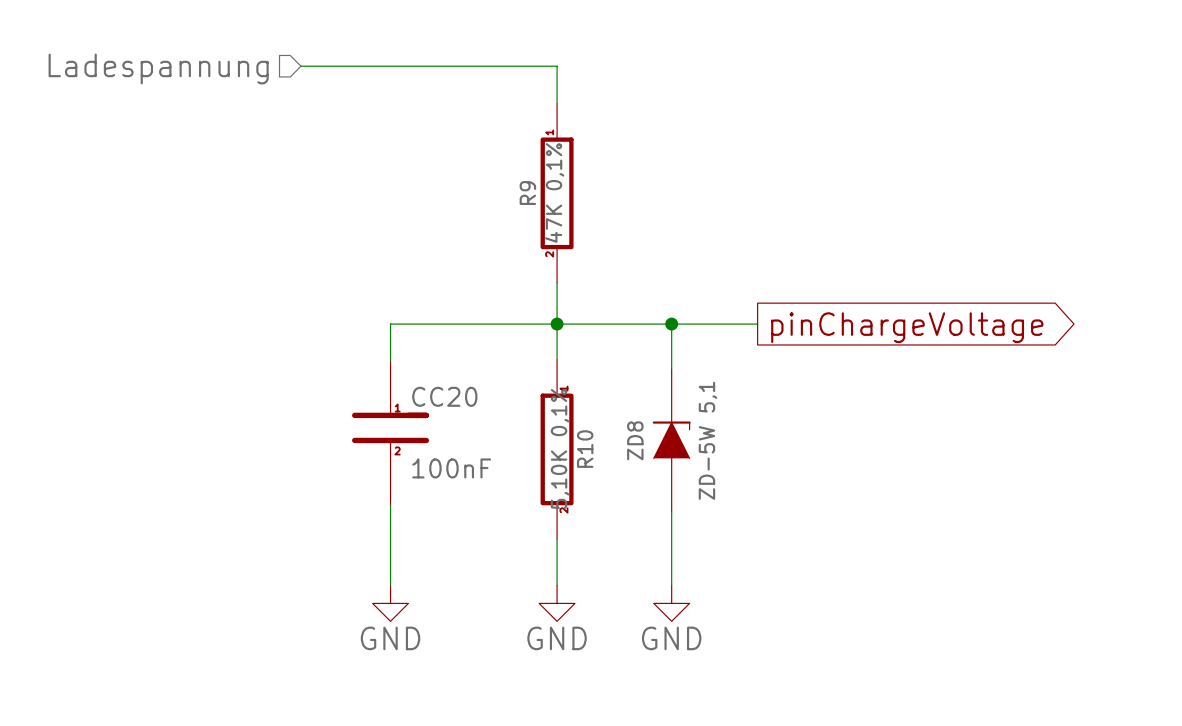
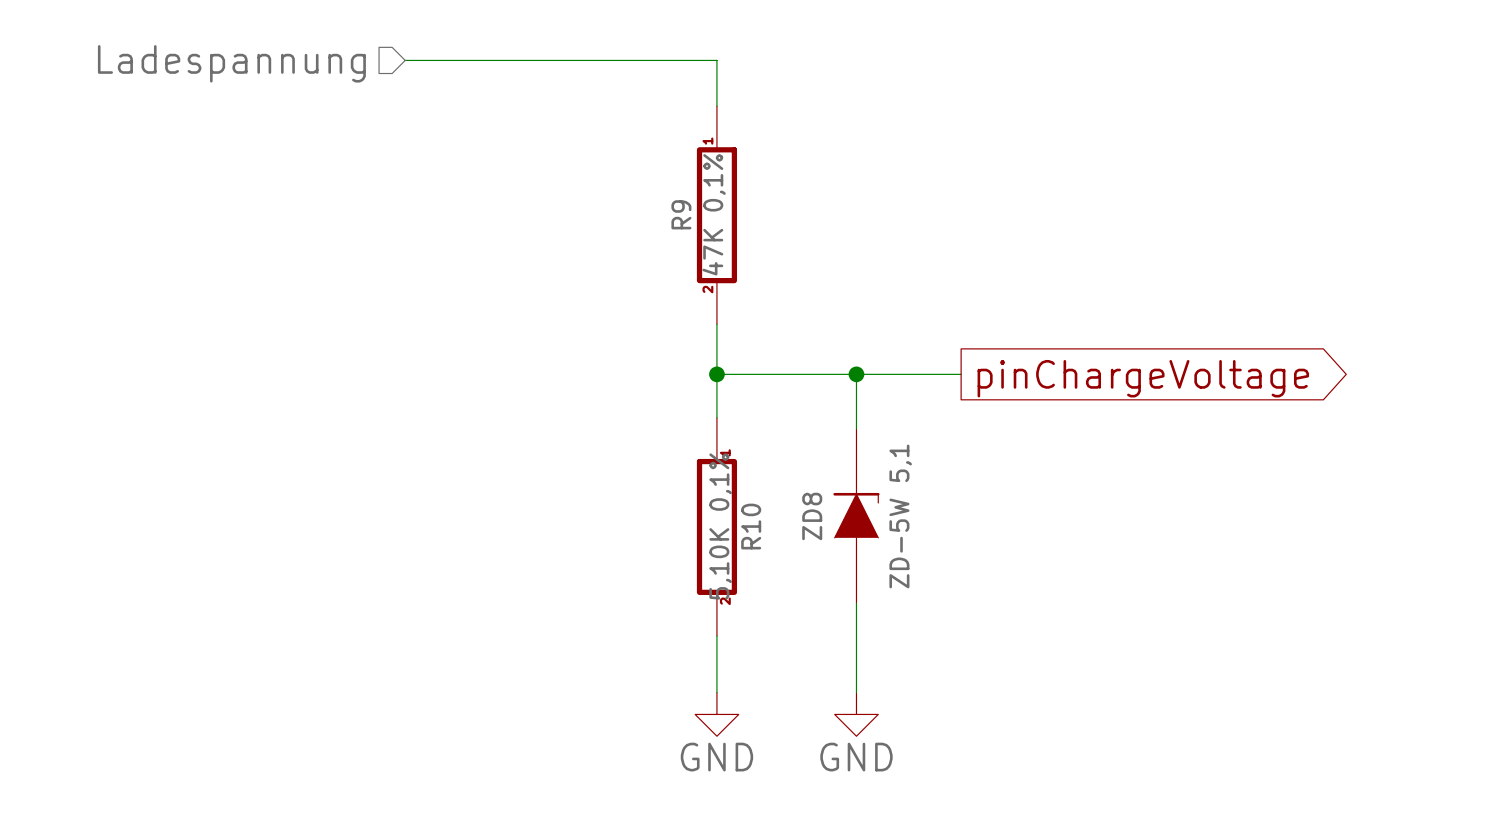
wire: (557, 324) (390, 324) (390, 361) -> none
CC20: 100nF (390, 433) -> none
wire: (390, 504) (390, 585) -> none
power symbol: GND (390, 603) -> none

